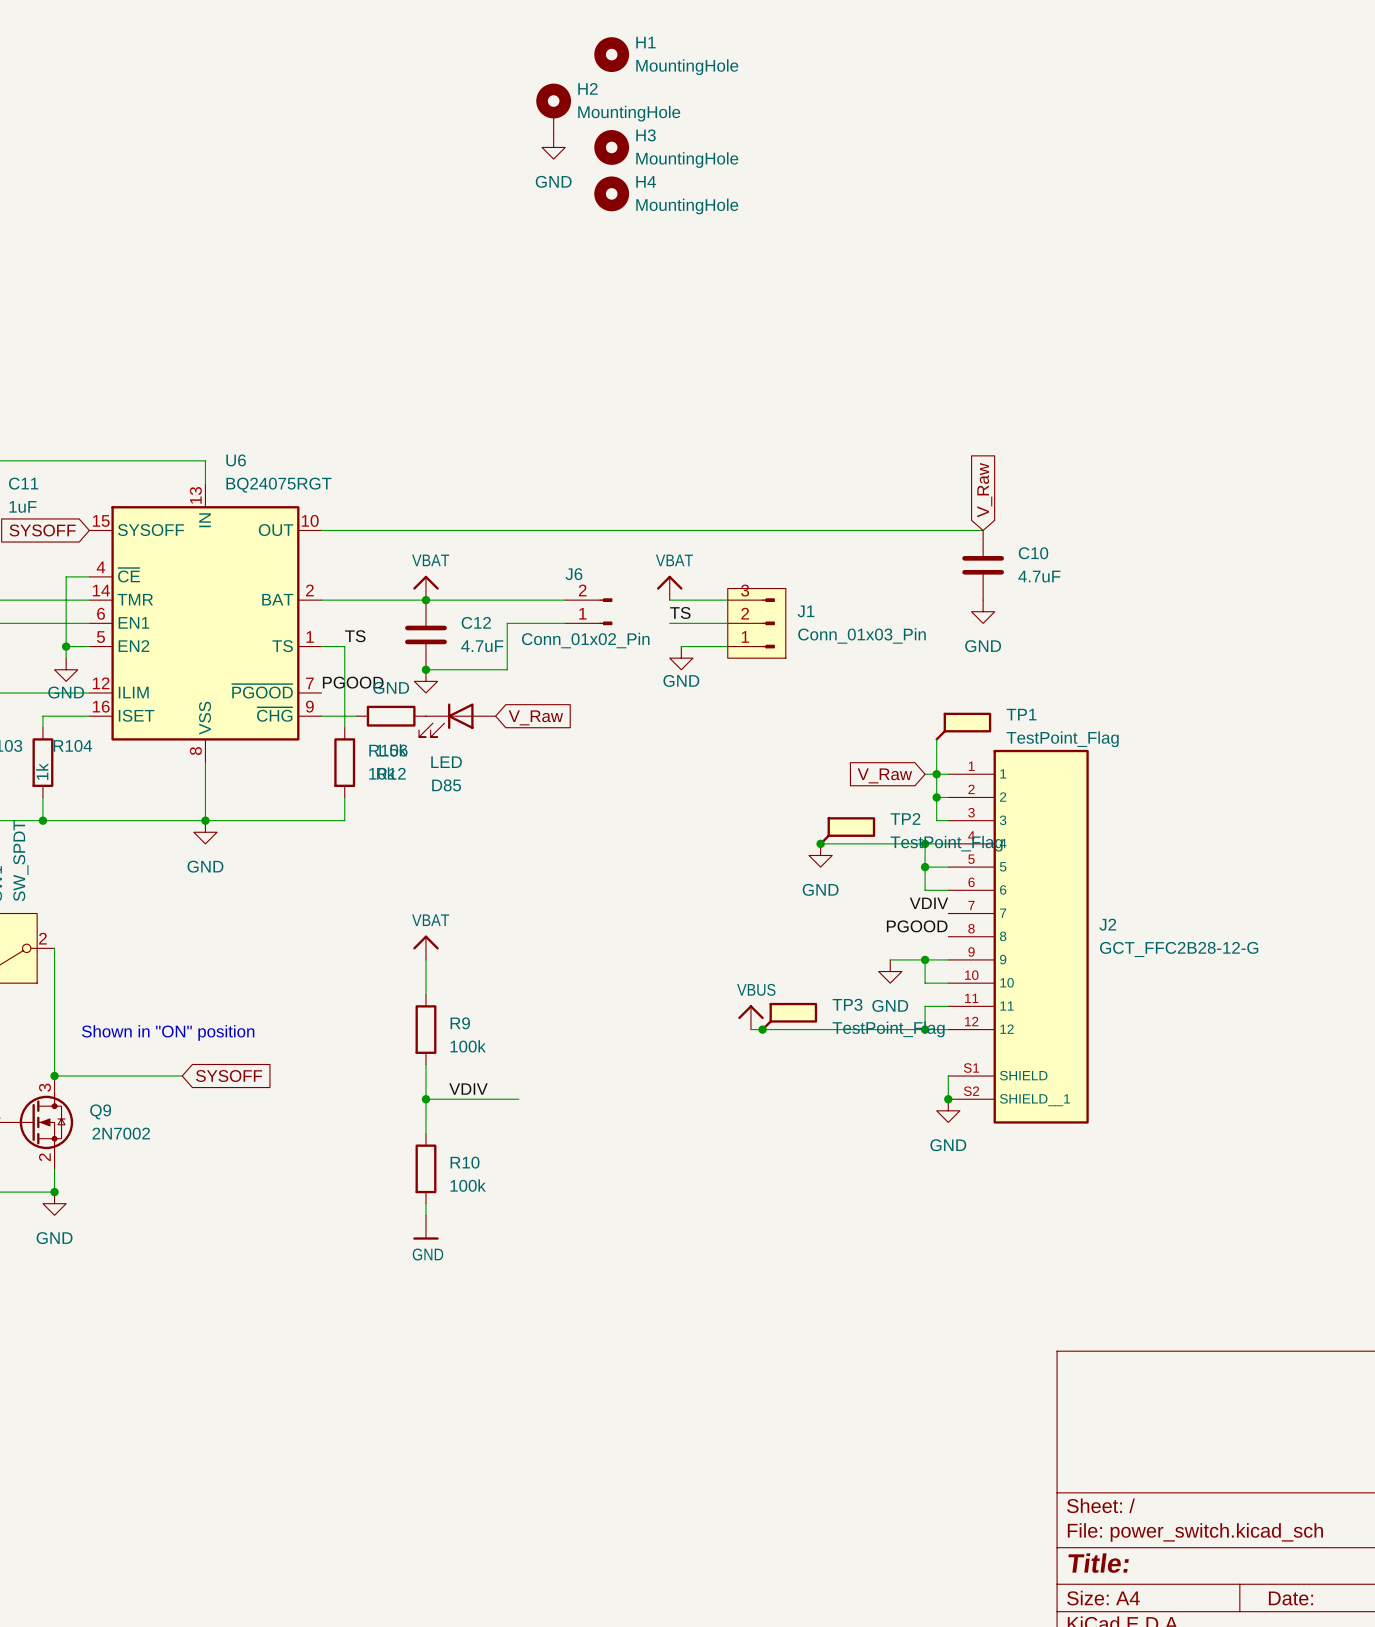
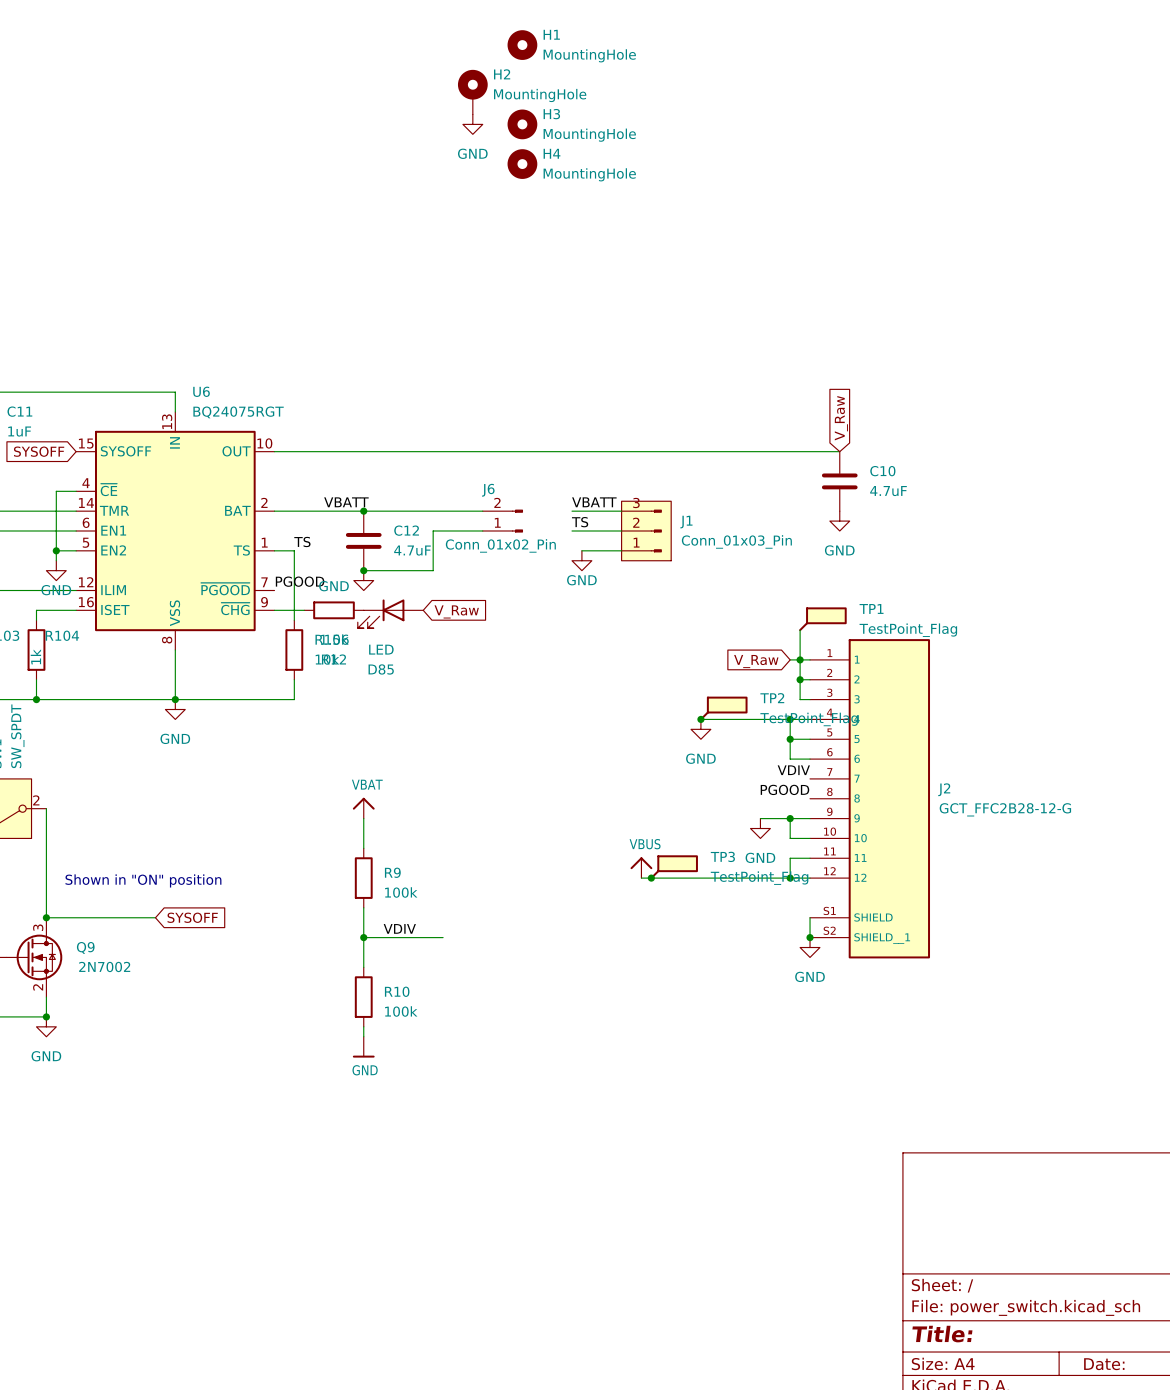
power symbol: VBAT (425, 587) -> none
power symbol: VBAT (669, 587) -> none
label: none -> VBATT (346, 502)
label: none -> VBATT (594, 502)

